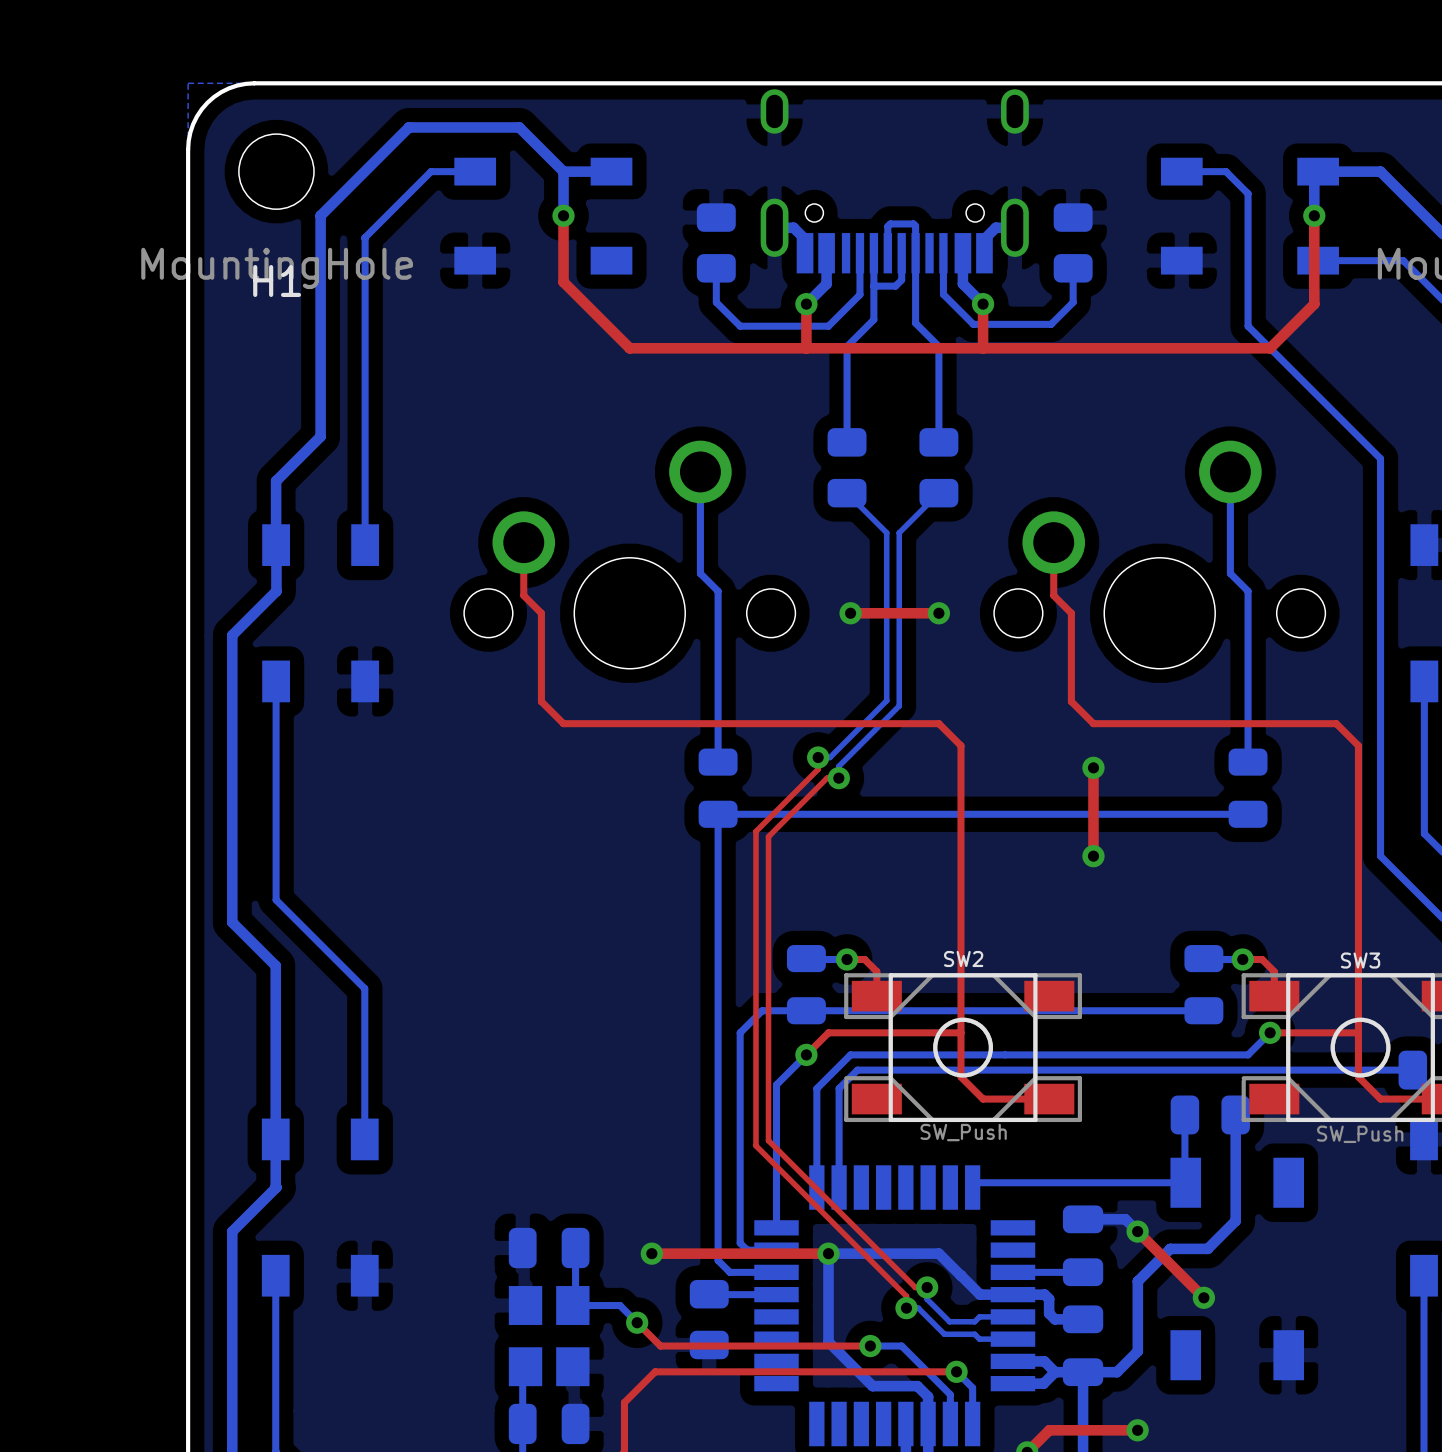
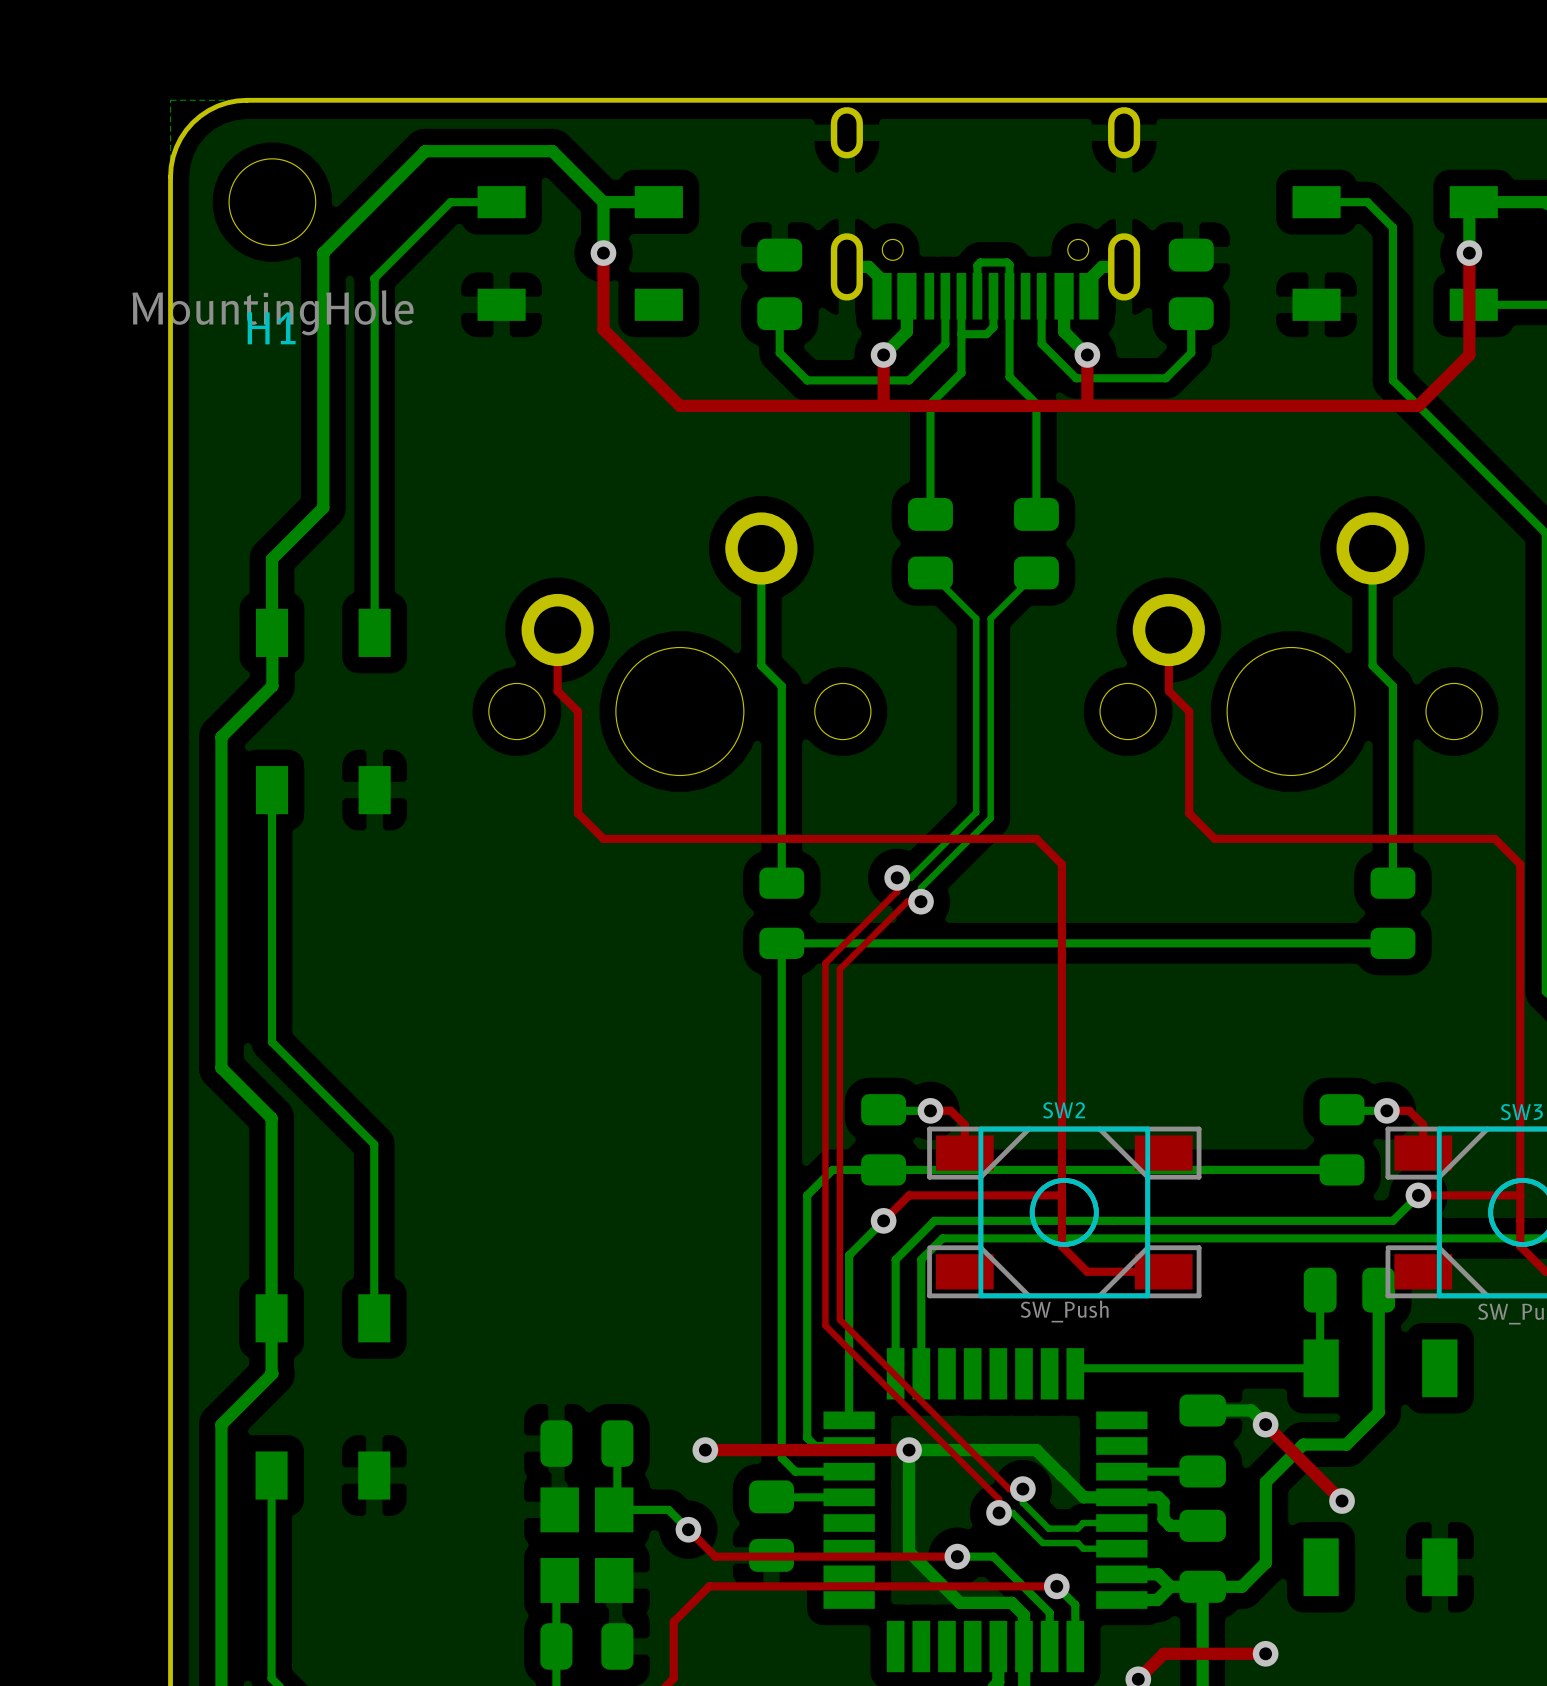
top track: (850, 613) (938, 613) -> none
via: (850, 613) -> none
via: (938, 613) -> none
top track: (1093, 767) (1093, 856) -> none
via: (1093, 767) -> none
via: (1093, 856) -> none

